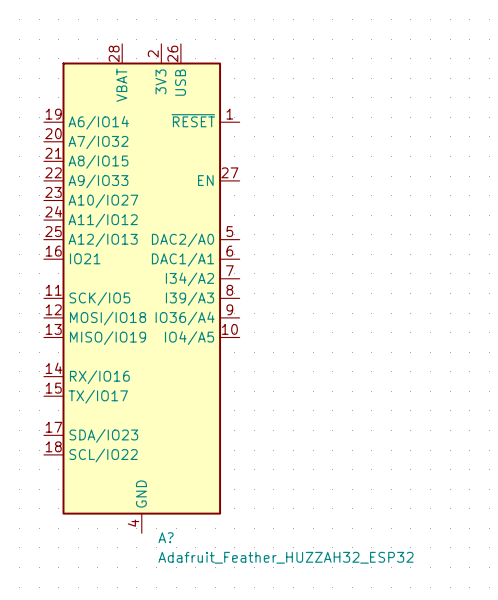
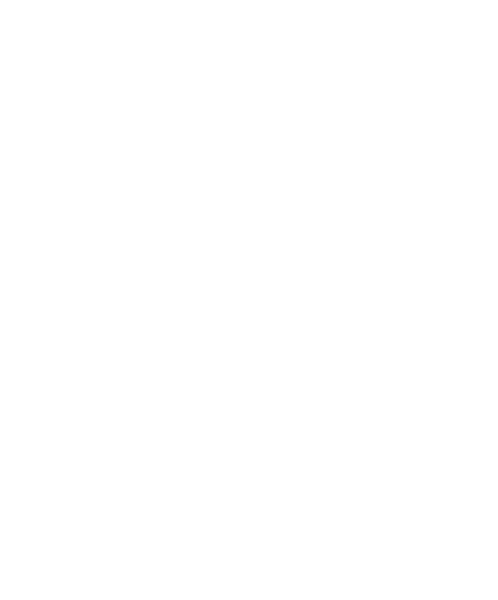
A?: Adafruit_Feather_HUZZAH32_ESP32 (141, 288) -> none

